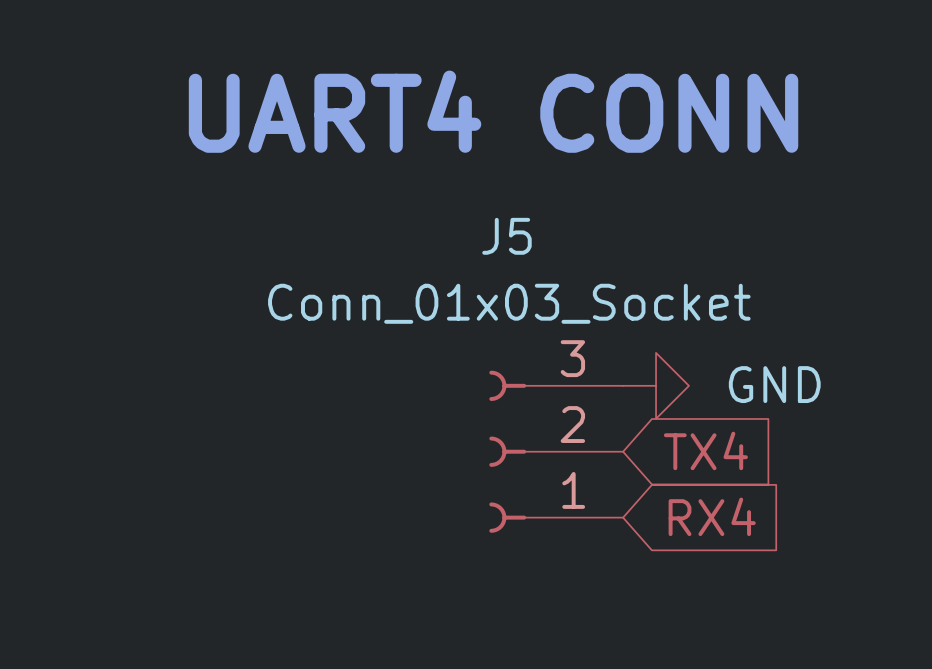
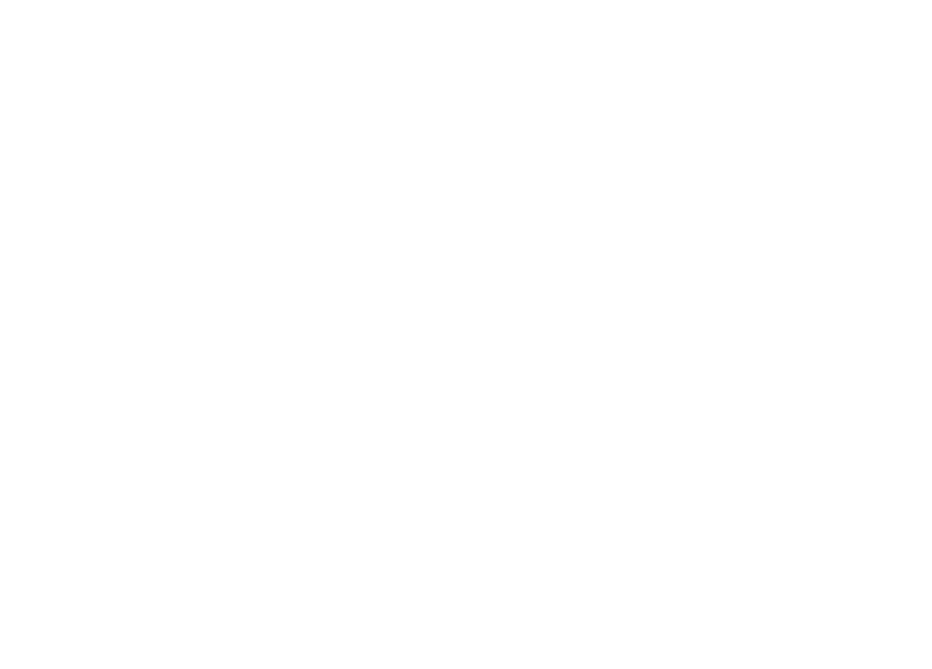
text: UART4 CONN (493, 111) -> none
power symbol: GND (656, 385) -> none
global label: TX4 (705, 450) -> none
J5: Conn_01x03_Socket (556, 451) -> none
global label: RX4 (712, 516) -> none

